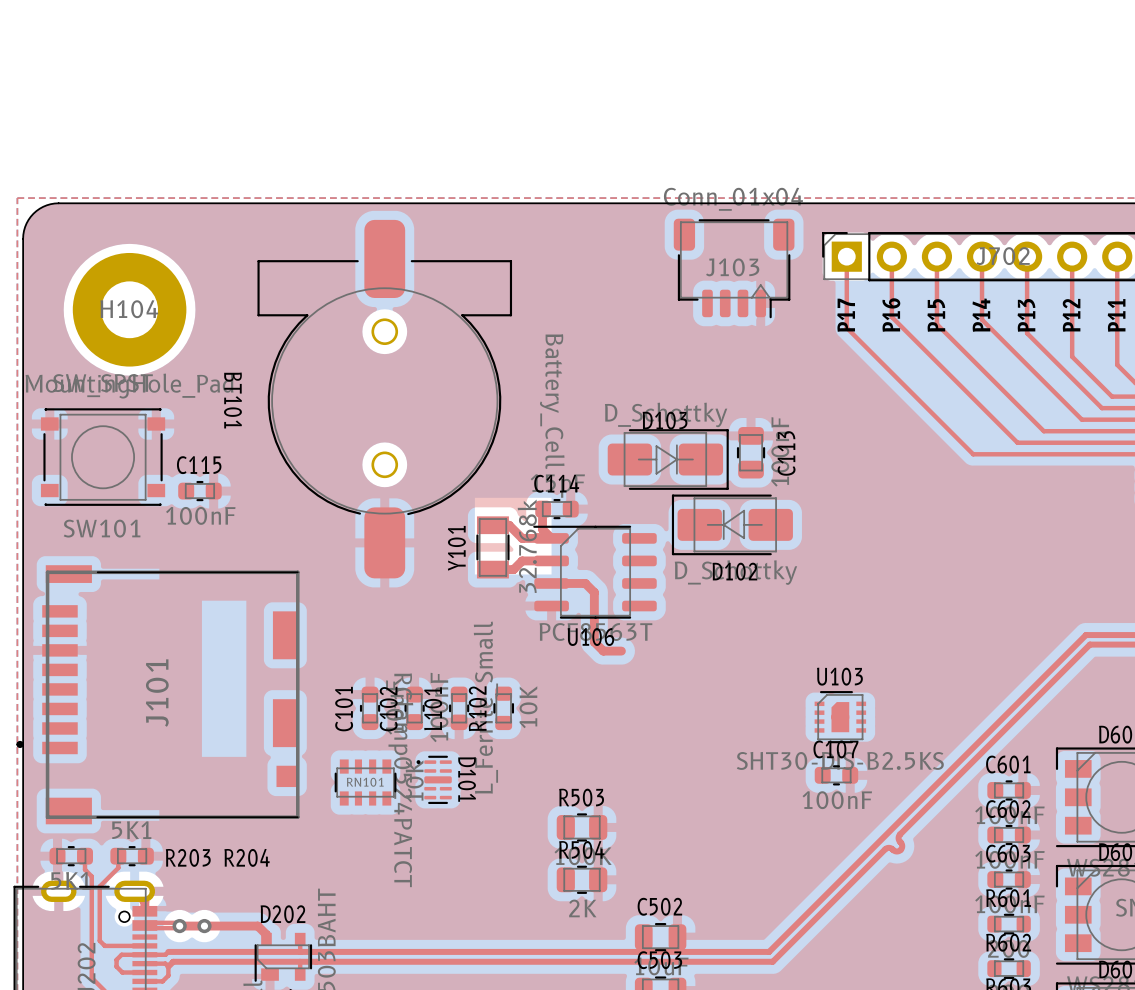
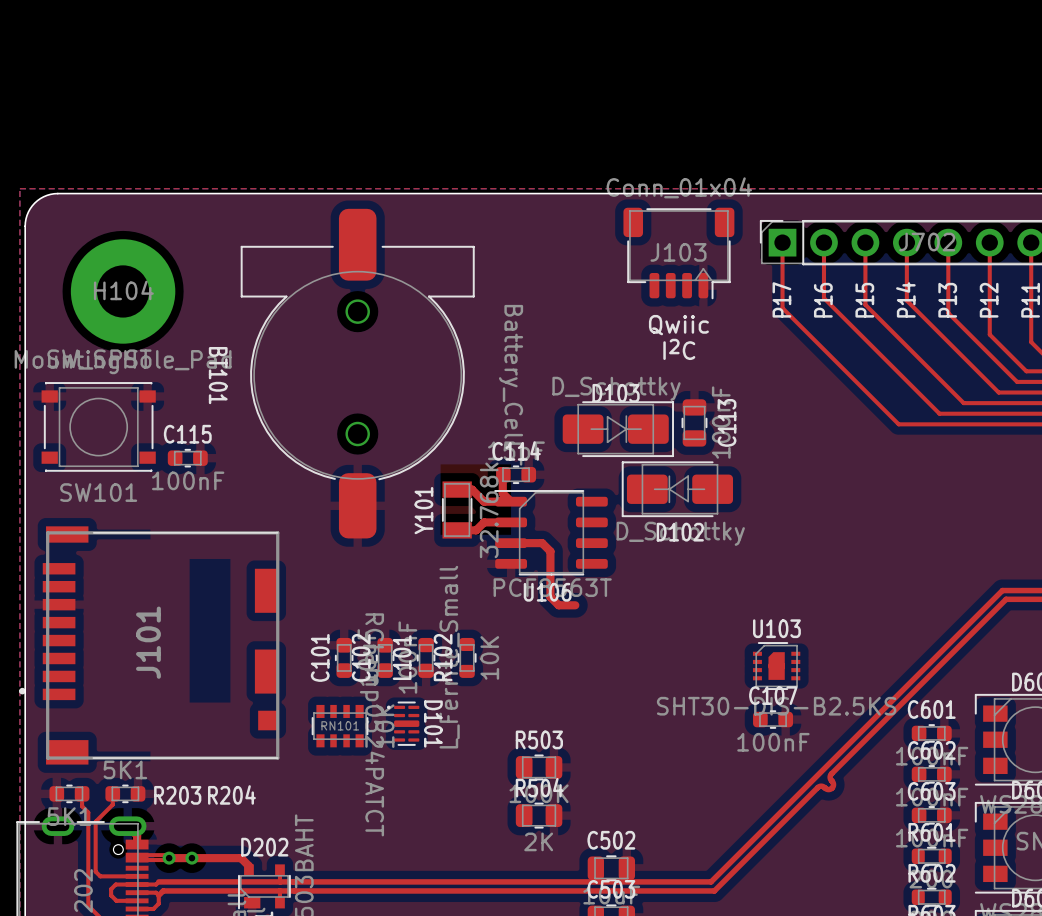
text: none -> Qwiic (678, 325)
text: none -> I2C (679, 349)

